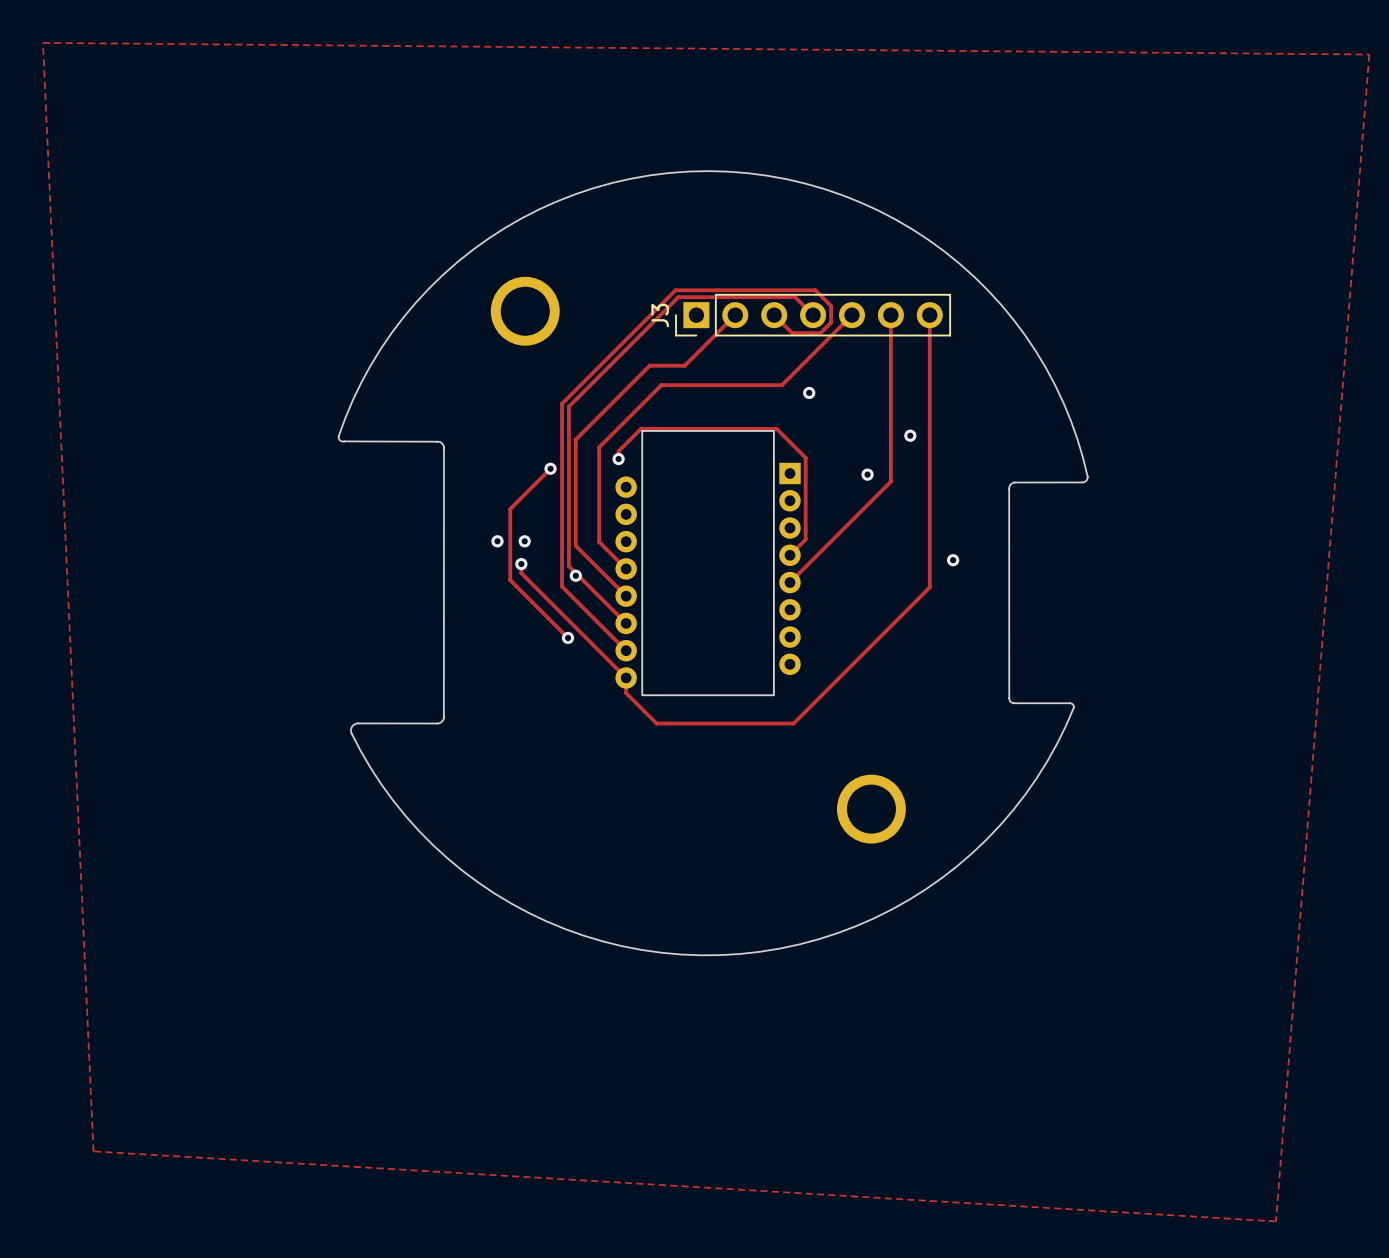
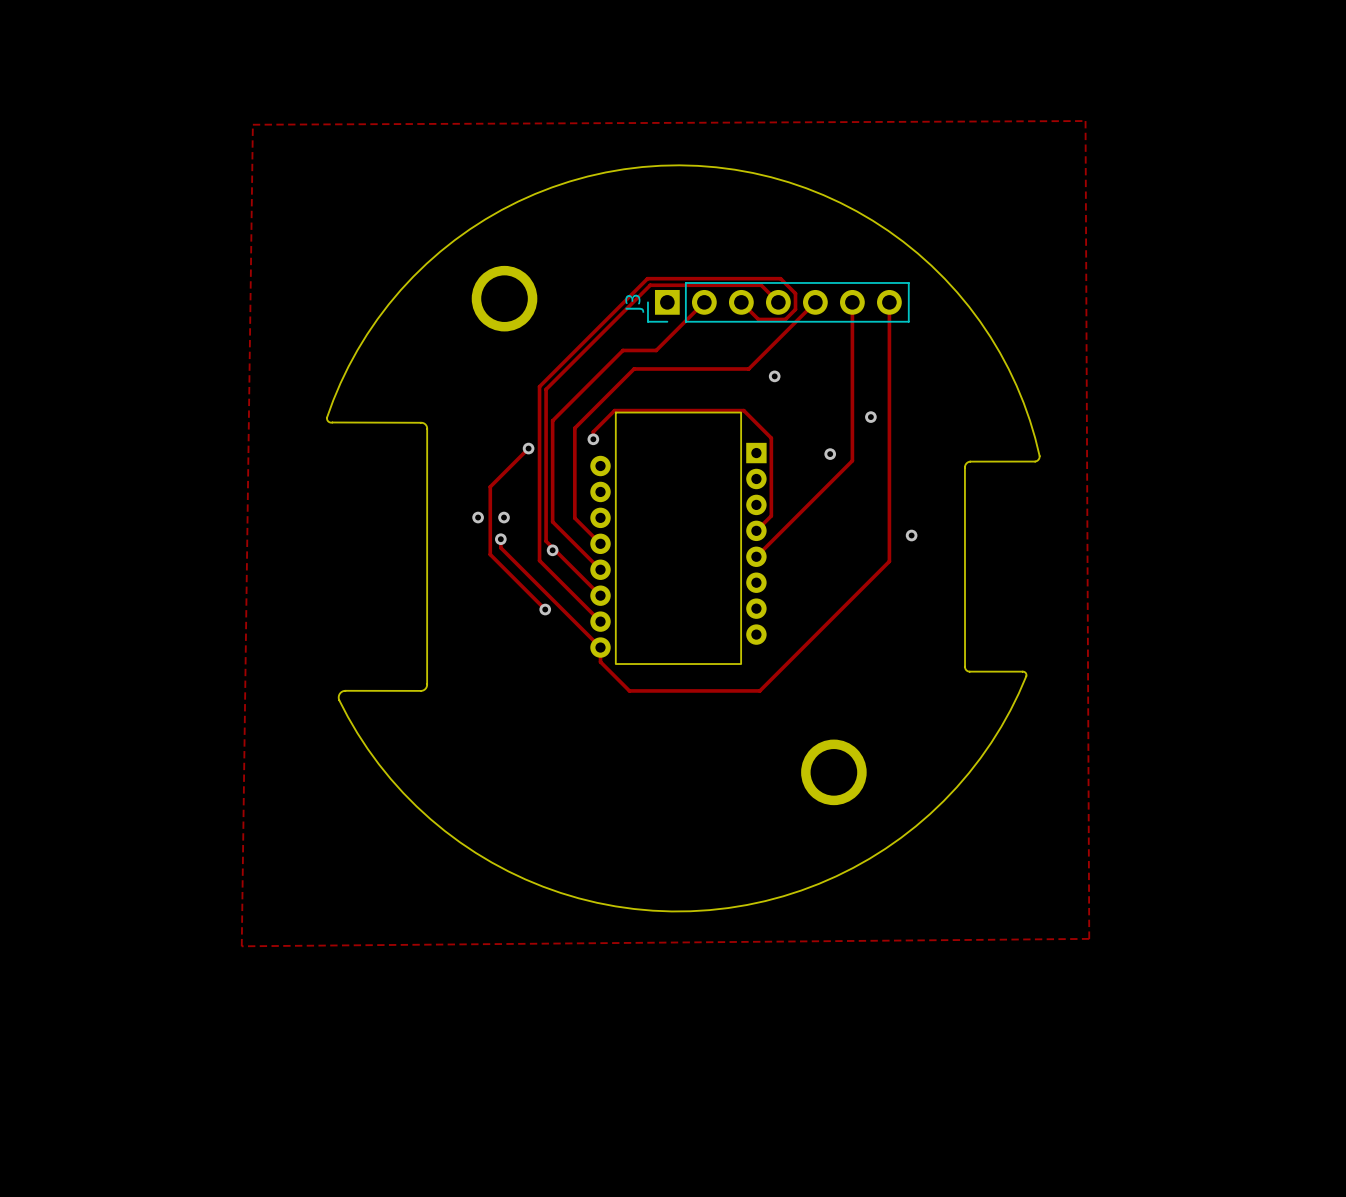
zone outline: (42, 42) (93, 1151) (1275, 1221) (1369, 54) (42, 42) -> none
zone outline: none -> (1085, 121) (1089, 938) (241, 946) (252, 124) (1085, 121)

